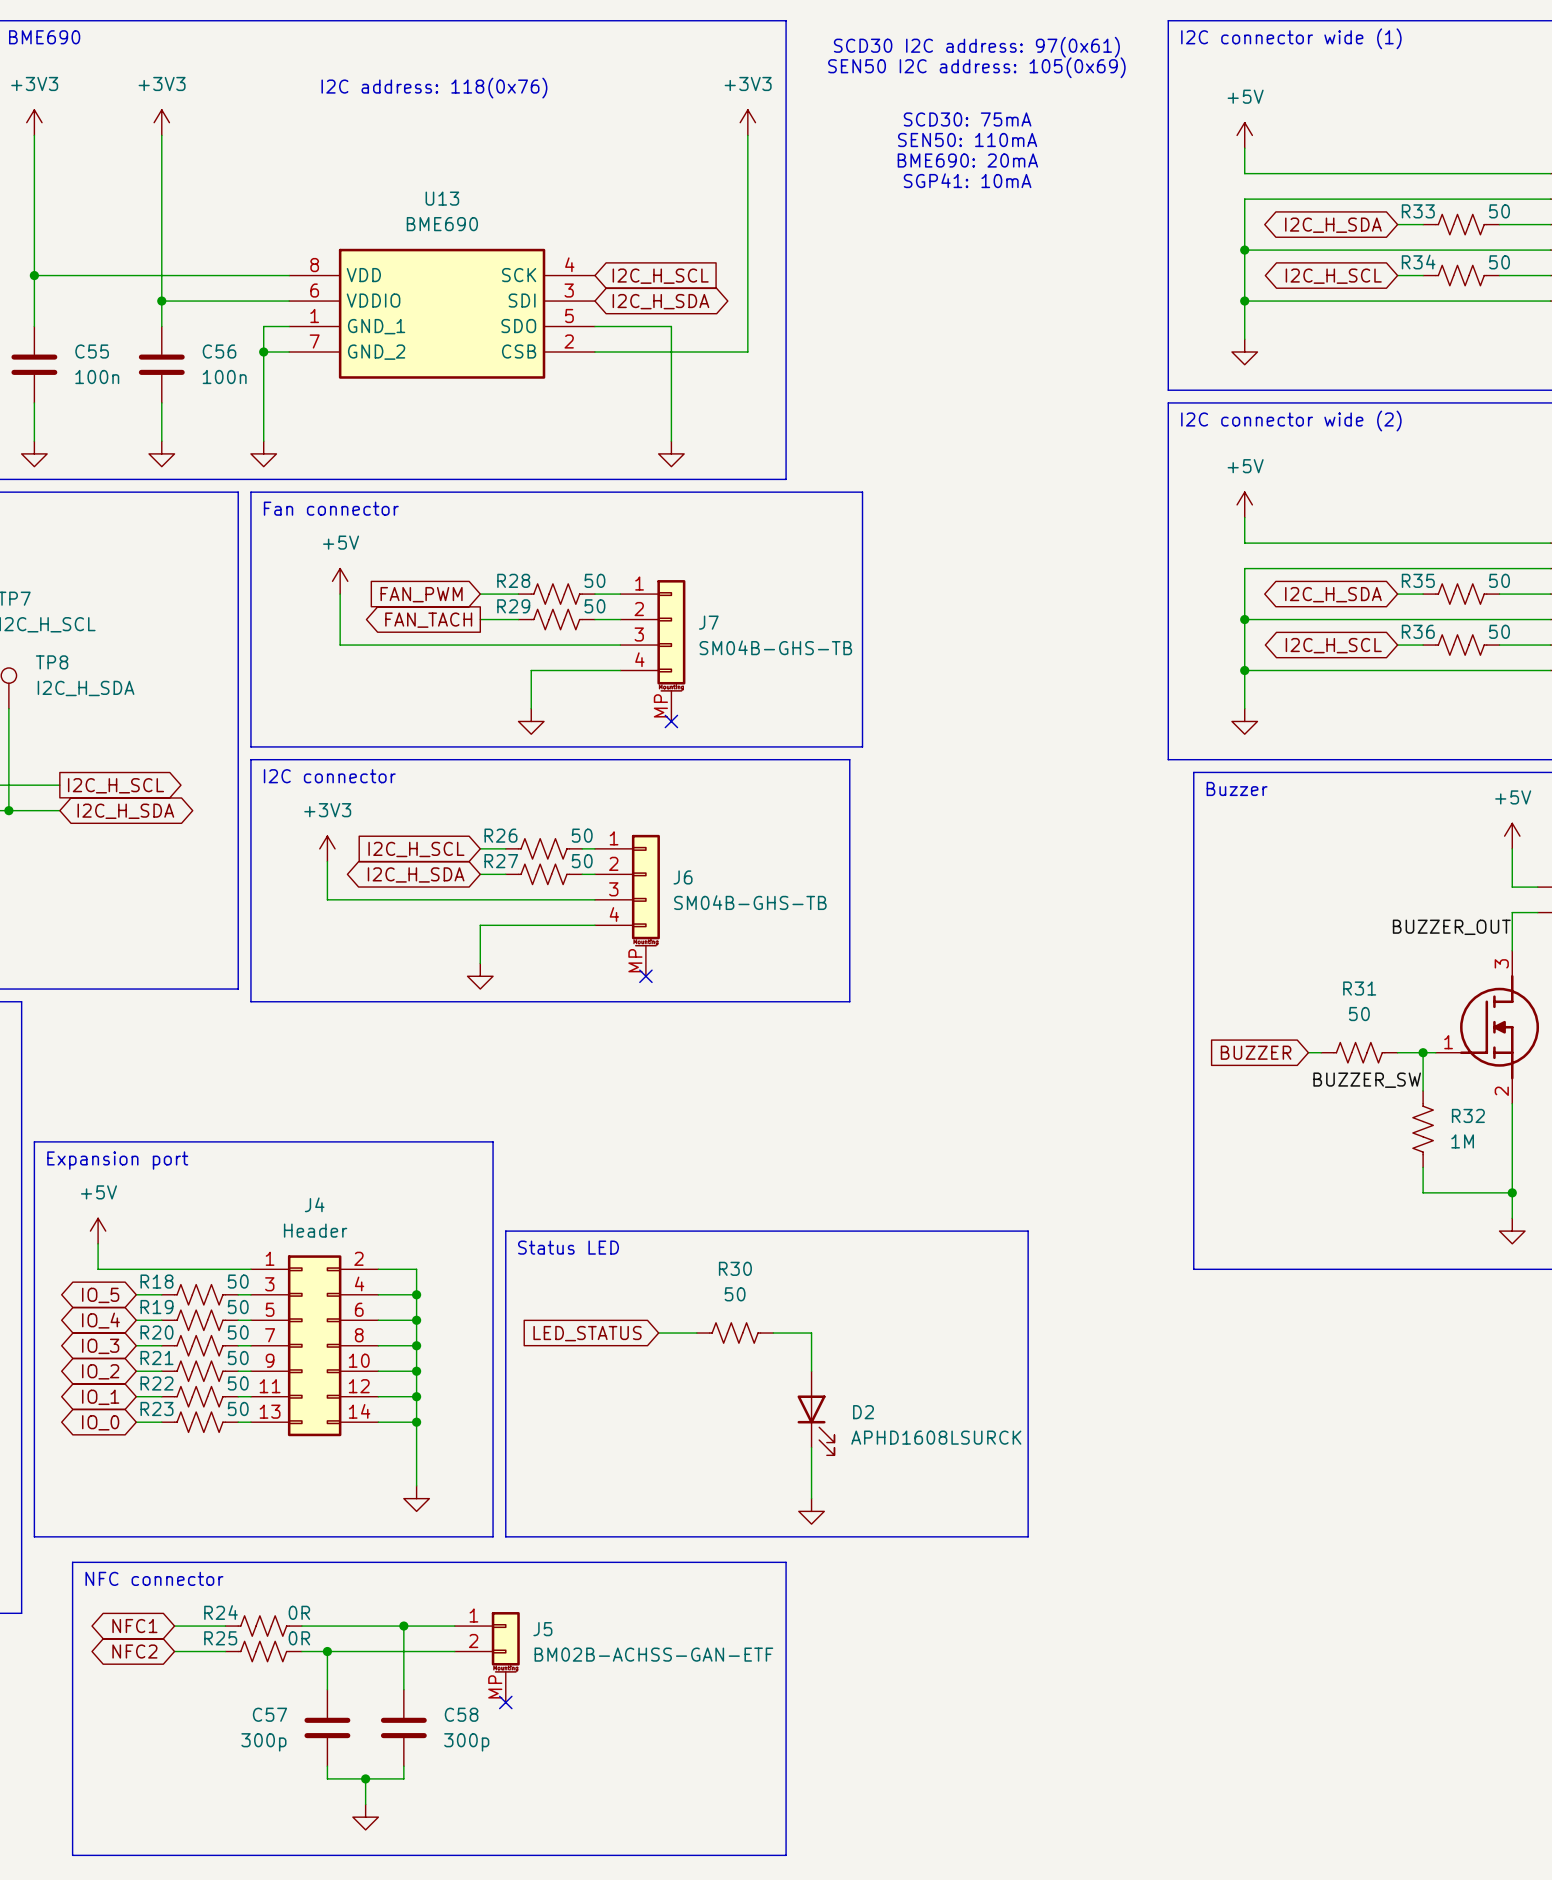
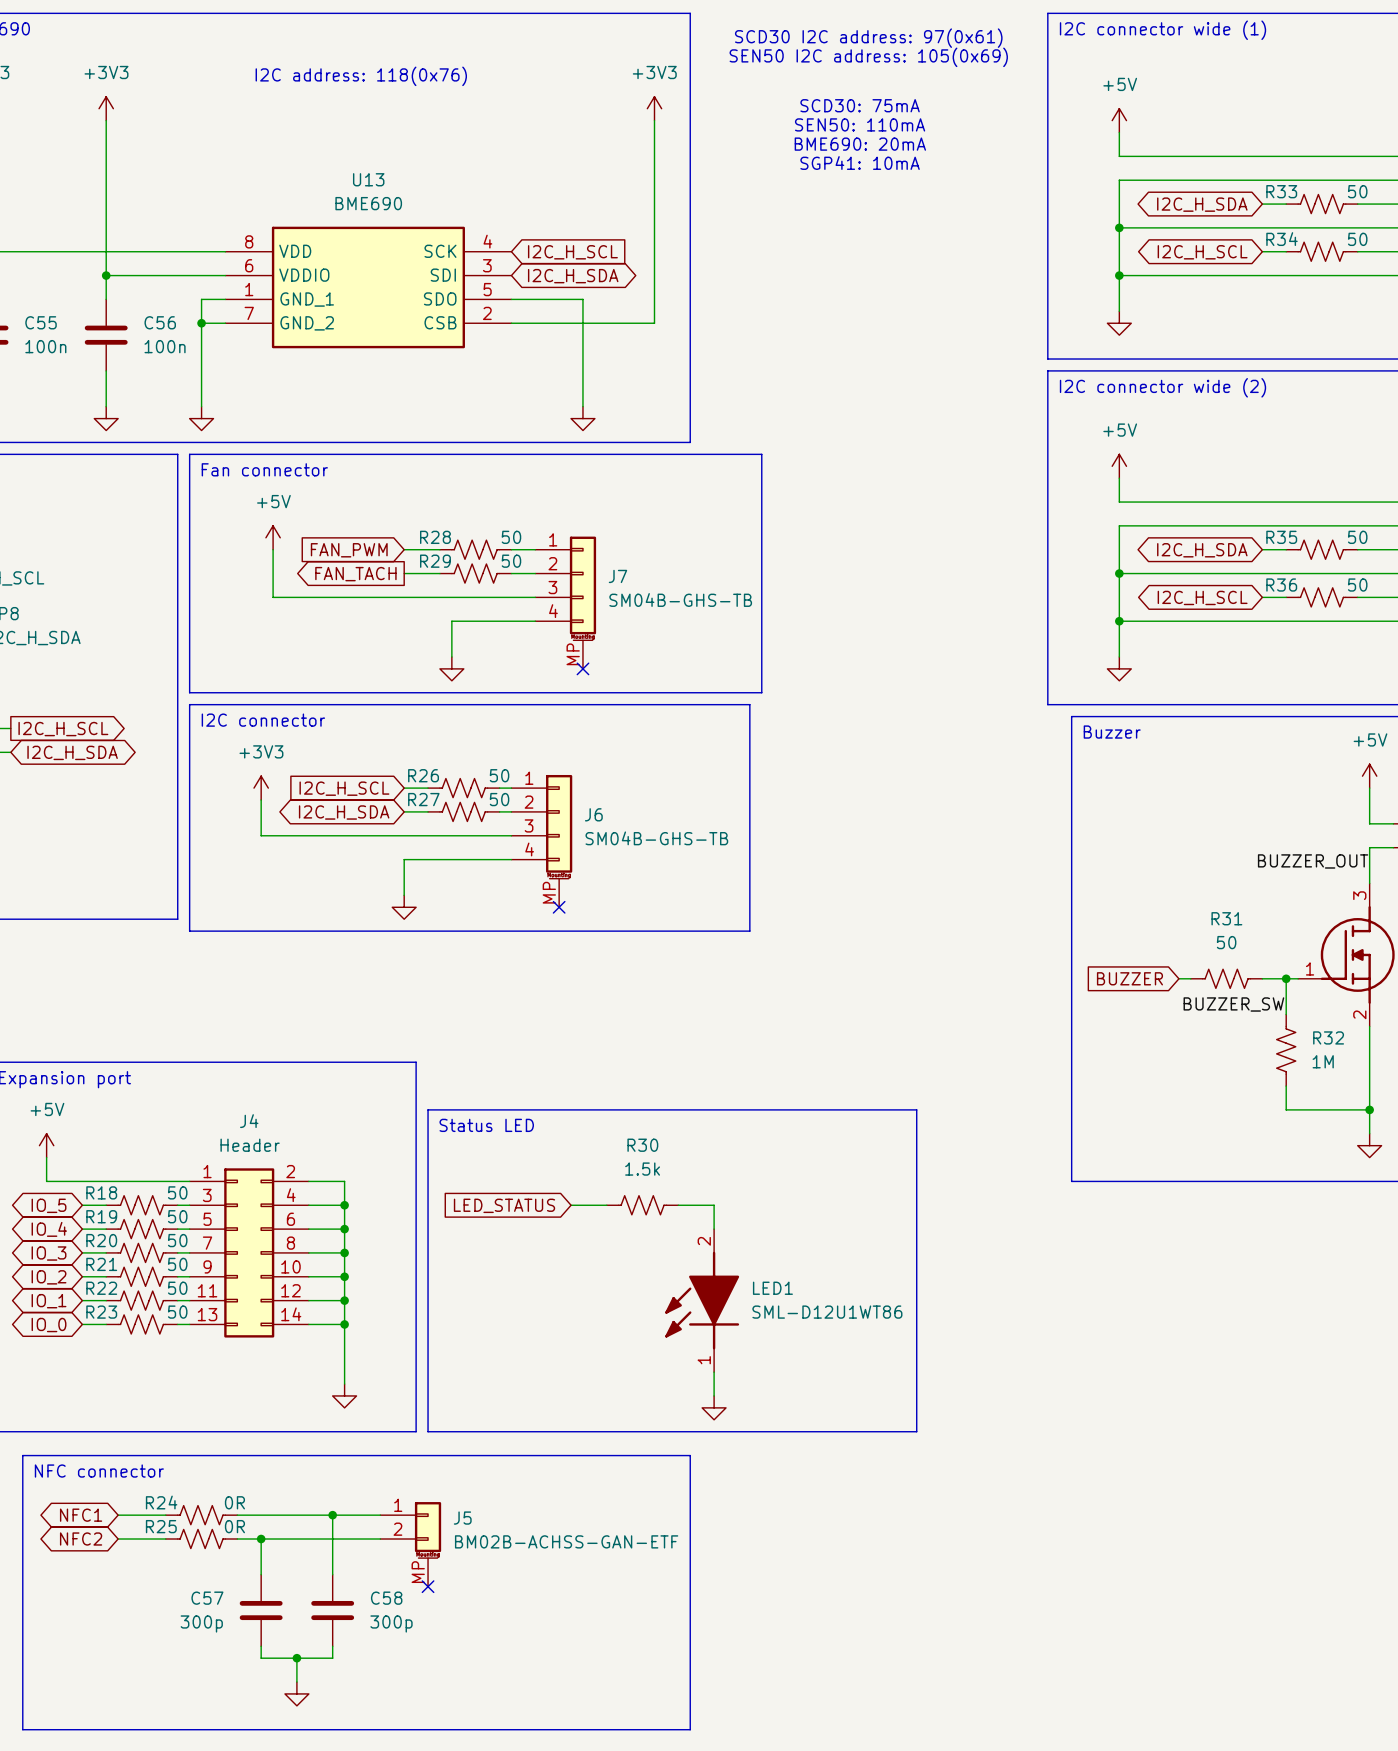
line: (505, 1231) (1028, 1231) -> (428, 1145) (428, 1109) (916, 1109) (916, 1145)
text position: Status LED (568, 1247) -> Status LED (486, 1125)
R30 value: 50 (735, 1294) -> 1.5k (642, 1169)
wire: none -> (678, 1205) (714, 1205) (714, 1229)
global label position: LED_STATUS (587, 1333) -> LED_STATUS (504, 1205)
wire: (658, 1333) (696, 1333) -> (571, 1205) (606, 1205)
R30 position: (735, 1333) -> (642, 1205)
wire: (773, 1333) (811, 1333) (811, 1371) -> none
LED1: none -> SML-D12U1WT86 (702, 1300)
D2: APHD1608LSURCK (816, 1413) -> none

